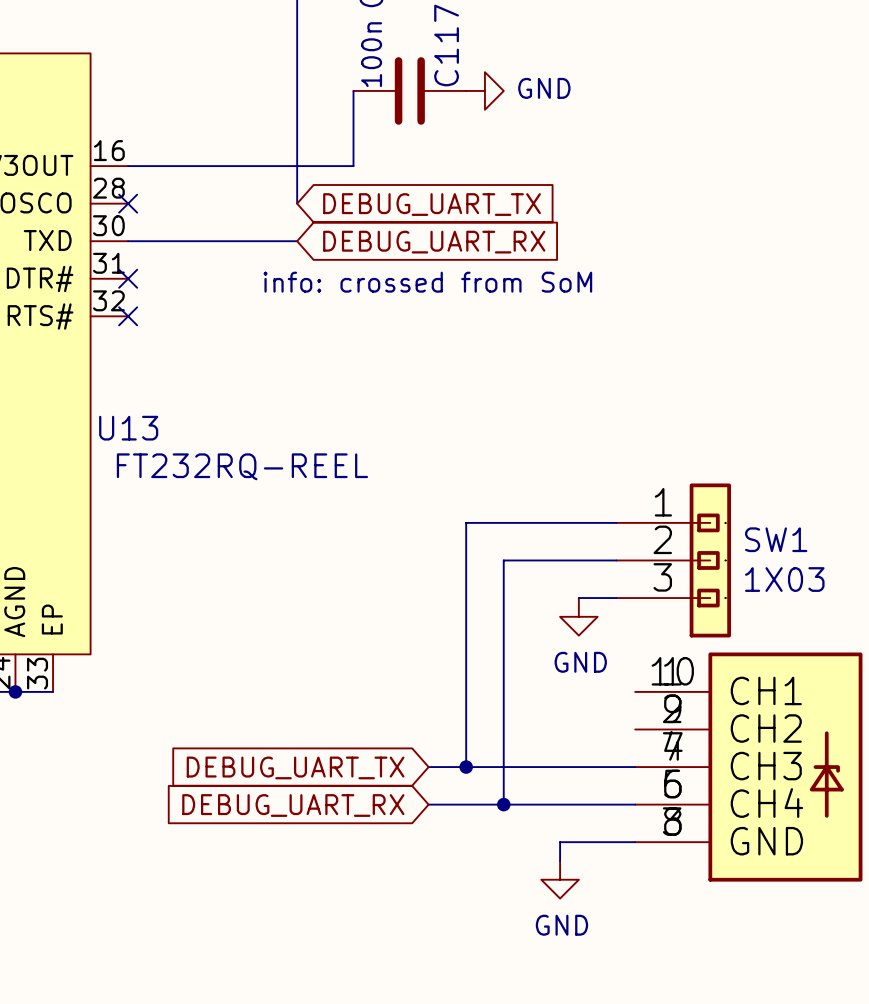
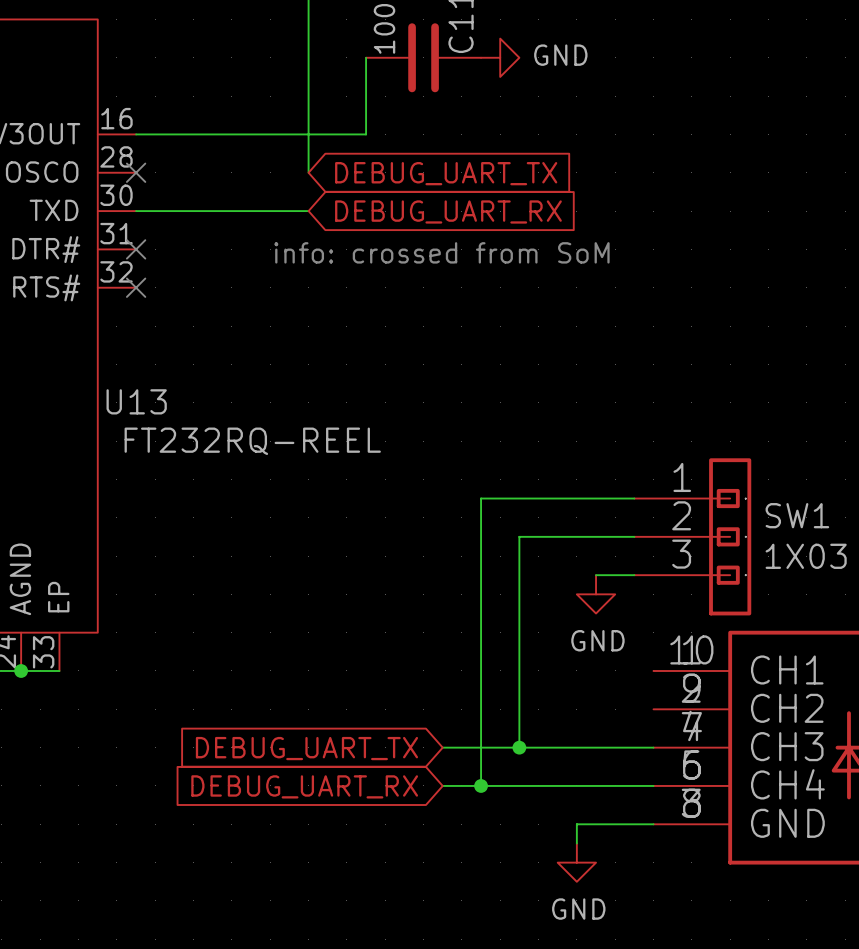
junction: (466, 767) -> none
wire: (503, 767) (503, 804) -> (481, 747) (481, 785)
junction: none -> (519, 747)
junction: none -> (481, 785)
junction: (503, 804) -> none

